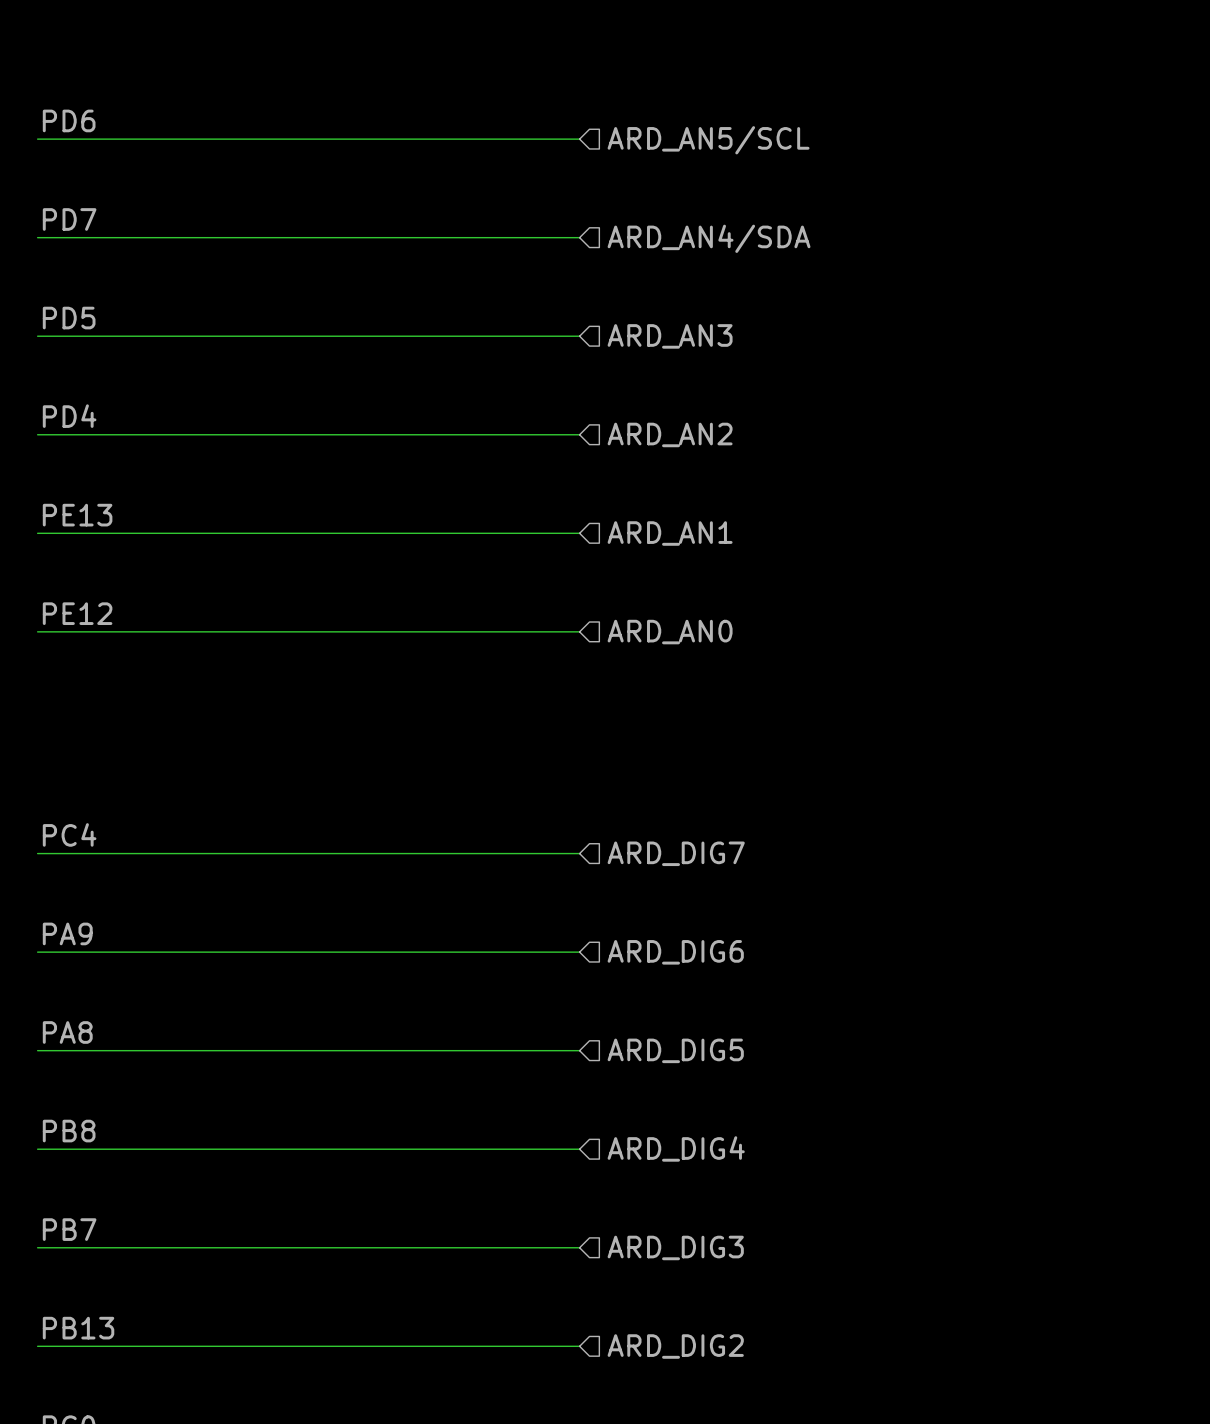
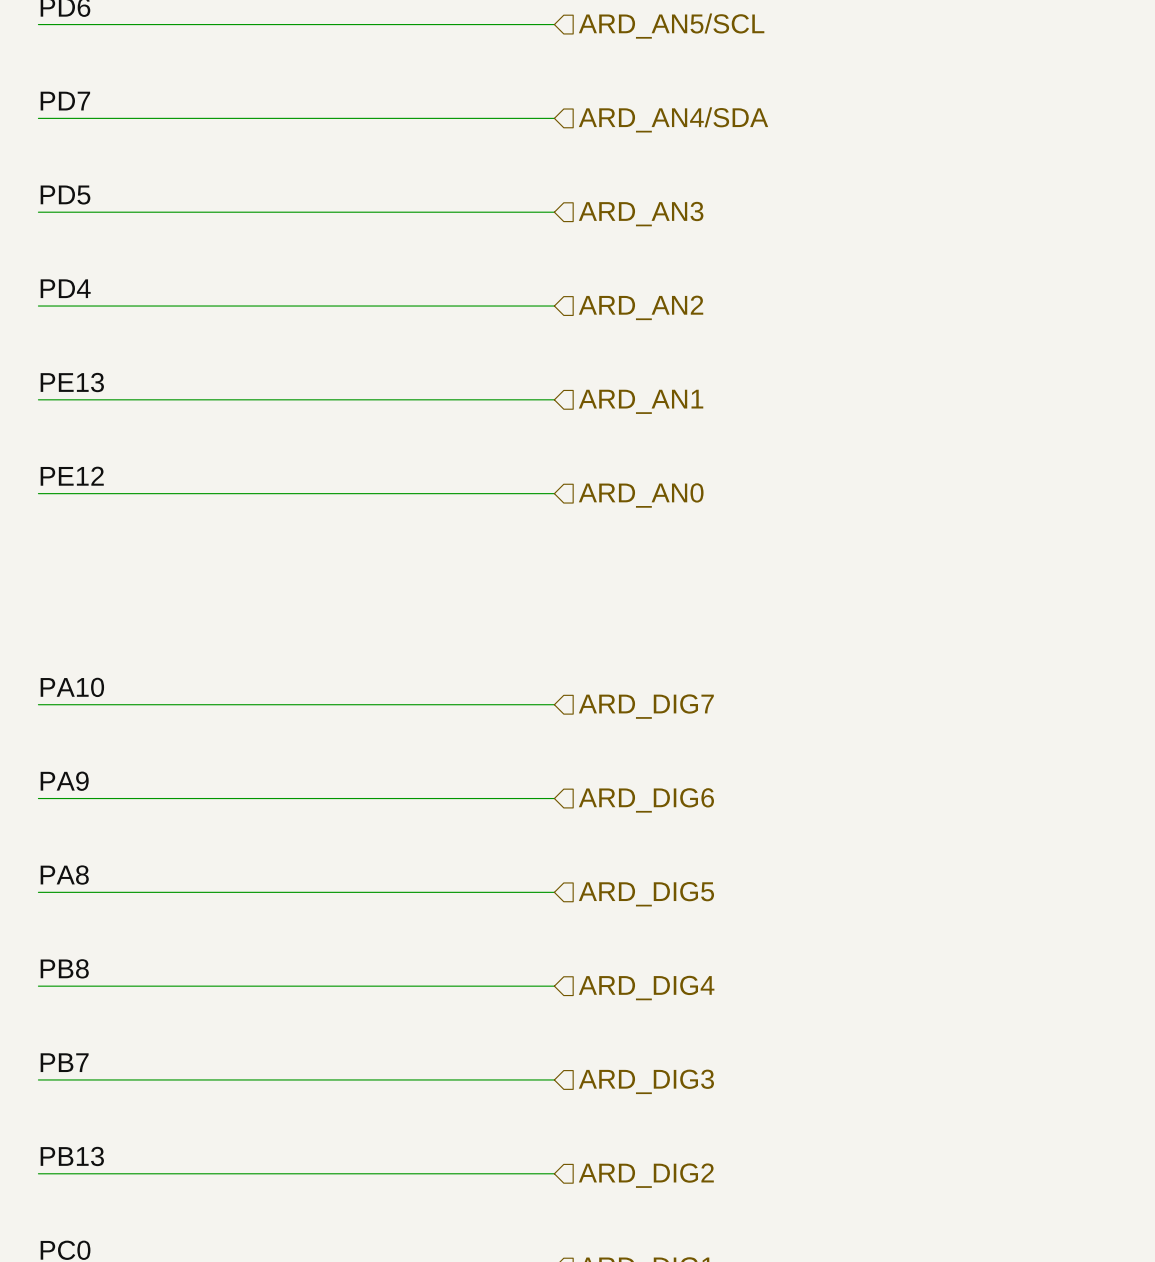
label: PC4 (69, 834) -> PA10 (72, 687)

